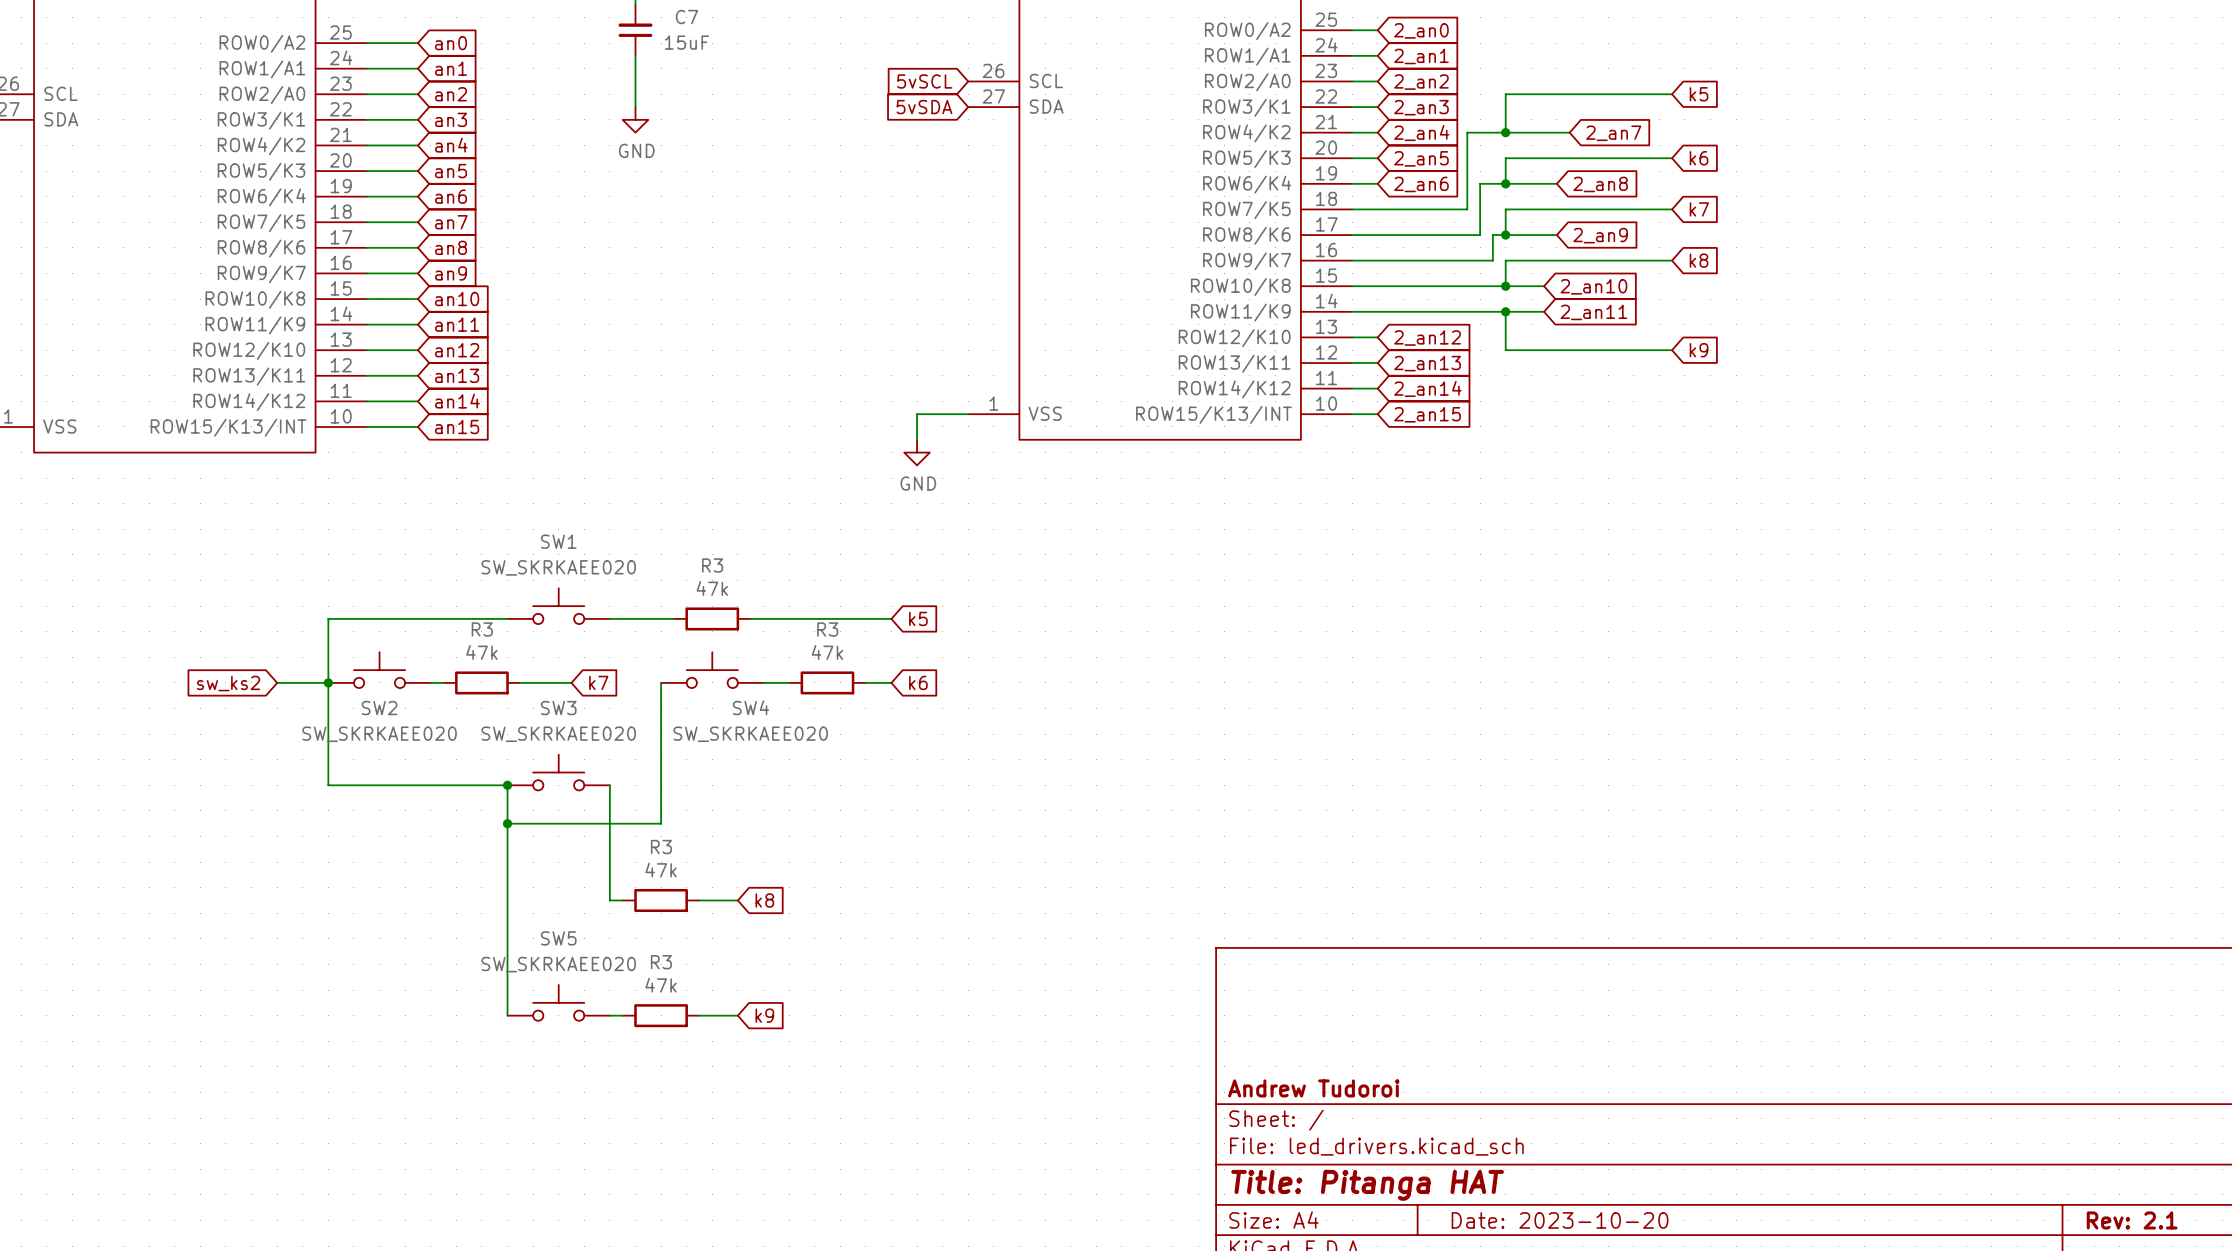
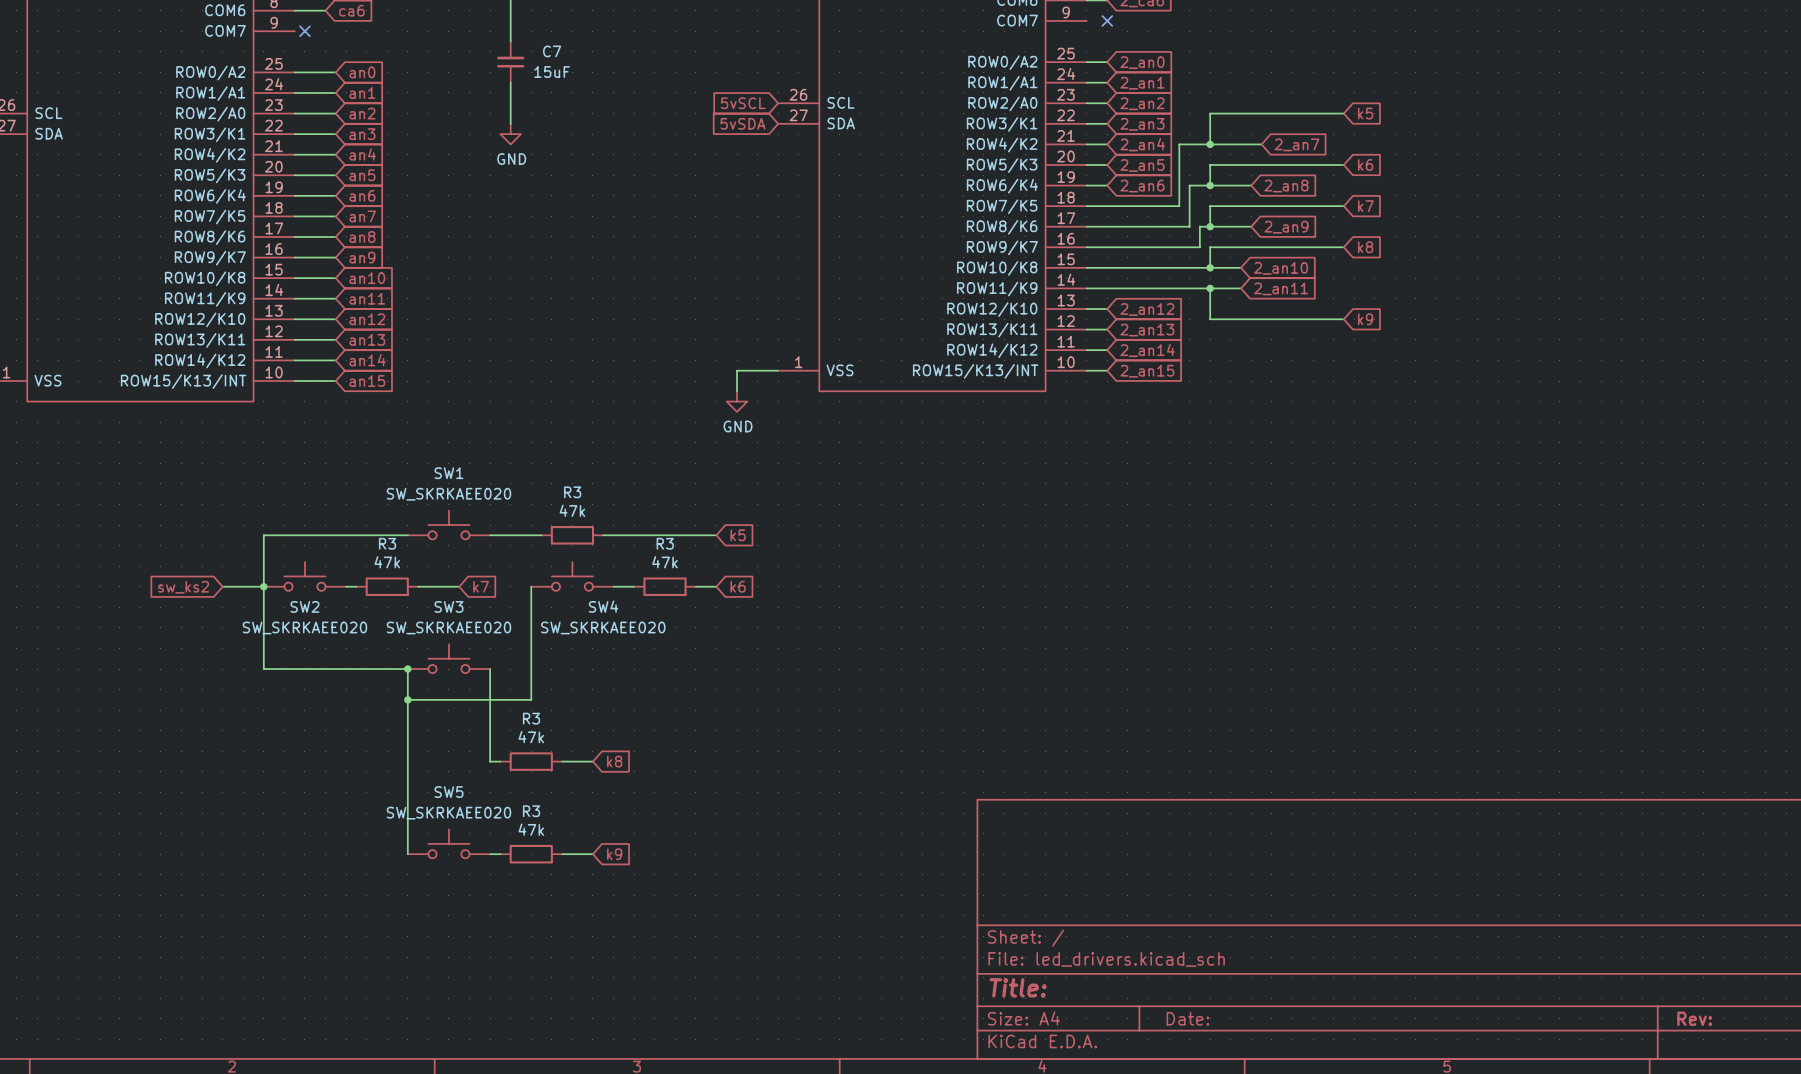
title block: Andrew Tudoroi (1313, 1088) -> none
title block: Title: Pitanga HAT (1367, 1185) -> Title: (1018, 987)
title block: Date: 2023-10-20 (1560, 1220) -> Date: (1187, 1018)
title block: Rev: 2.1 (2132, 1220) -> Rev: (1694, 1018)

